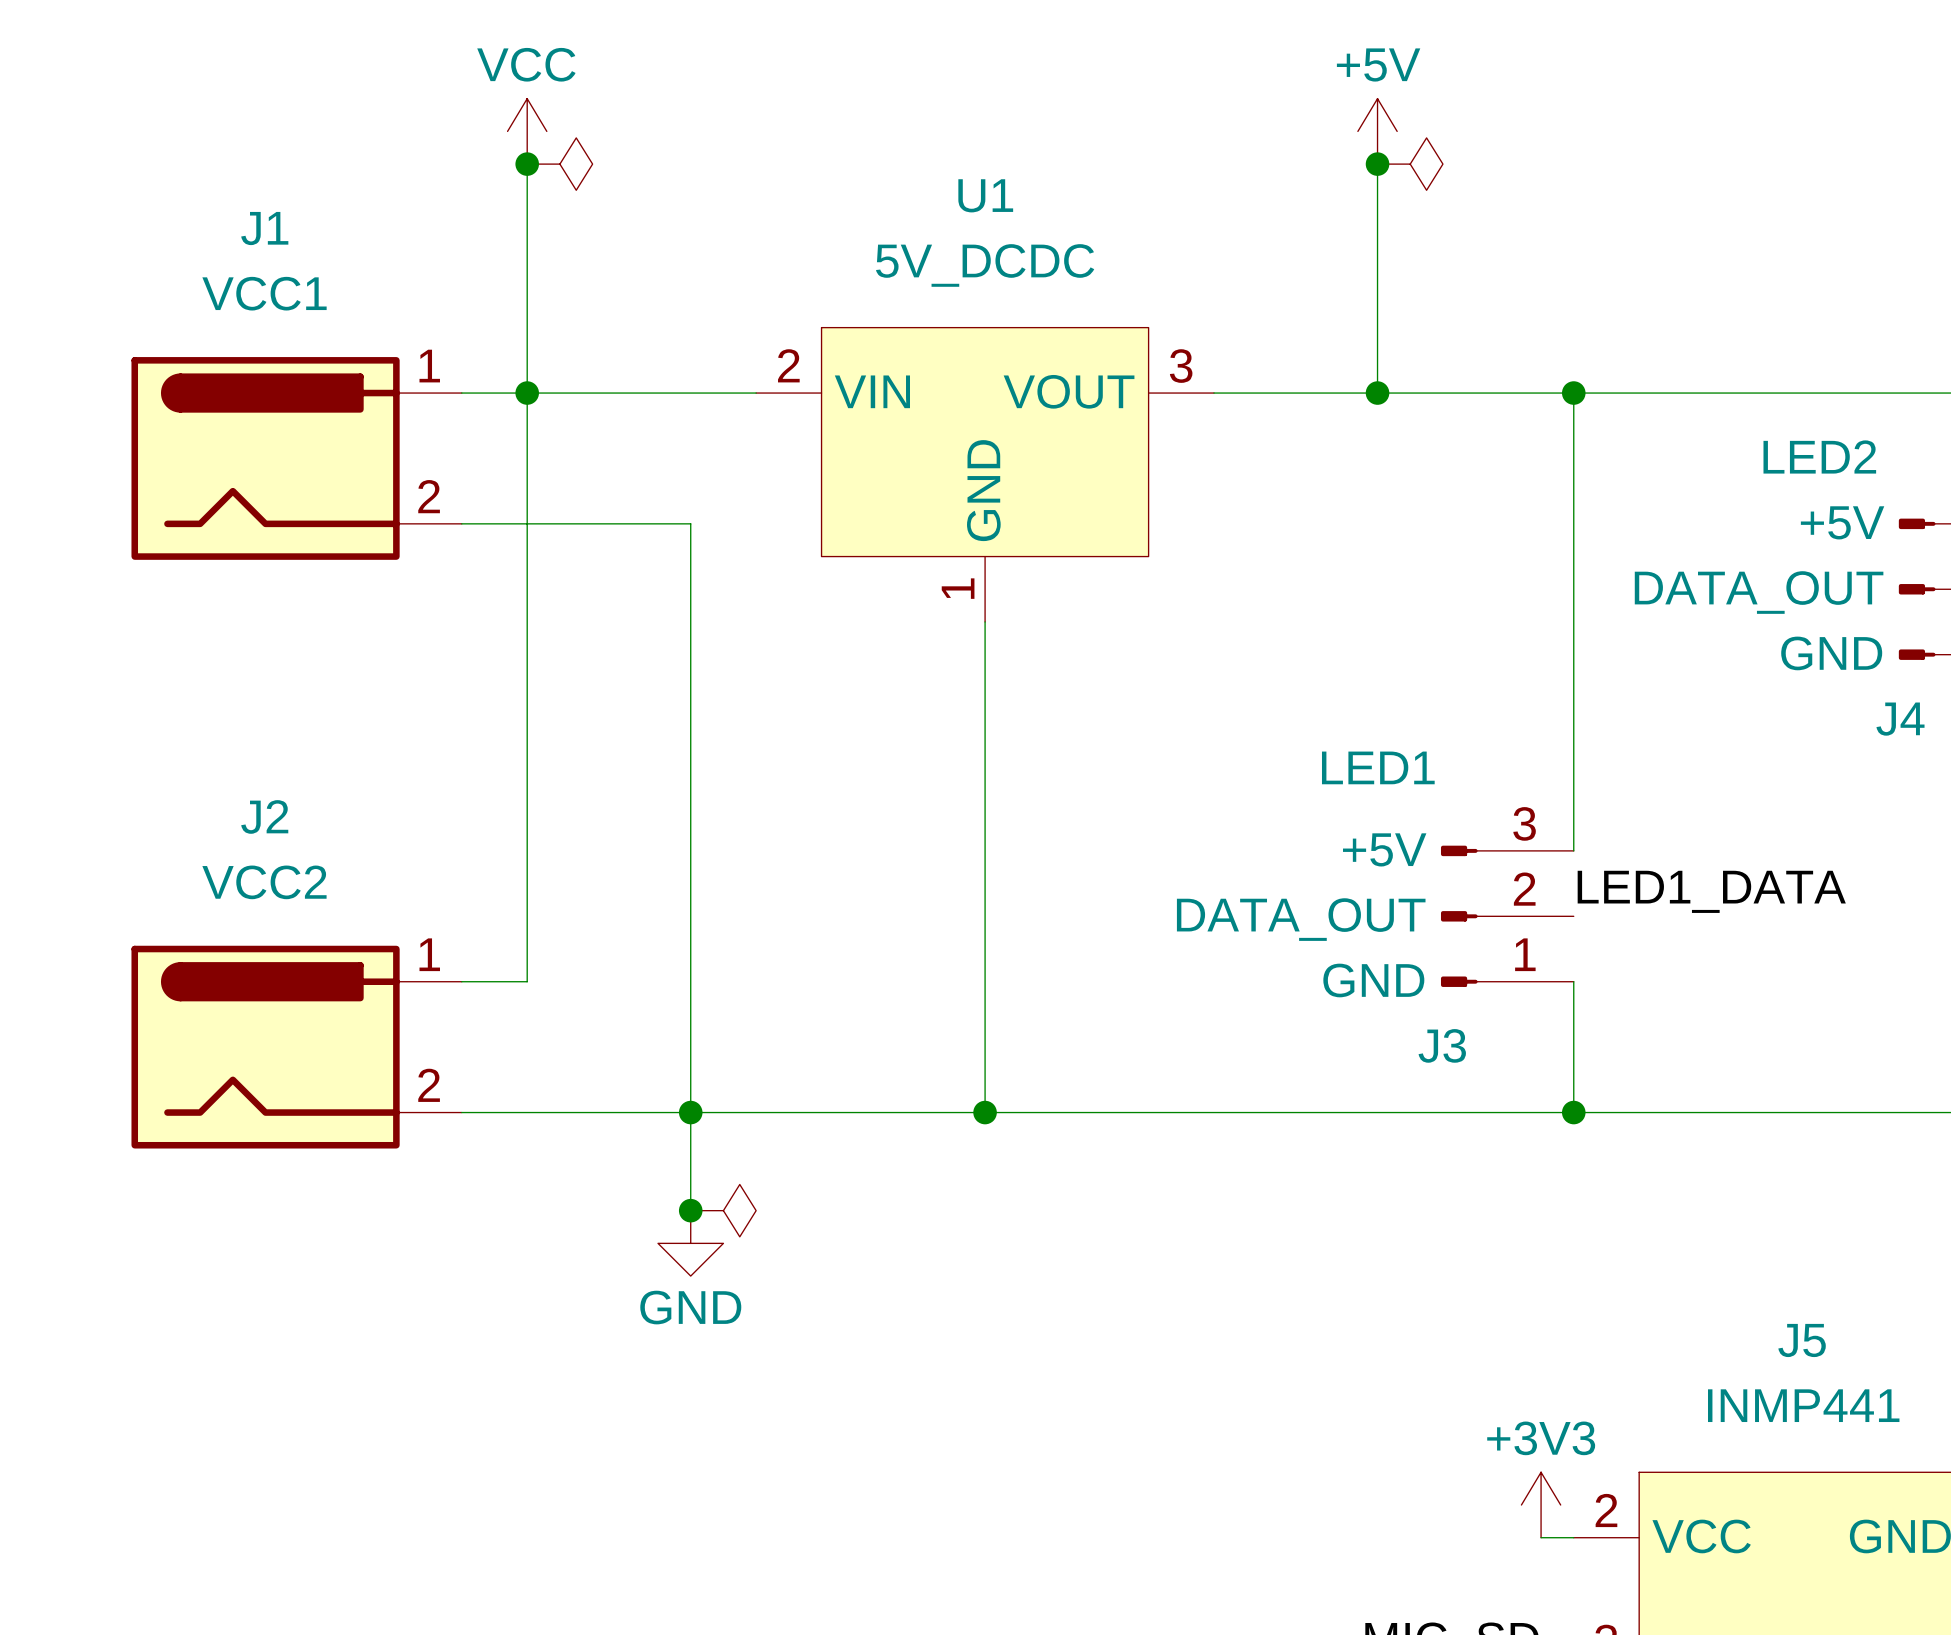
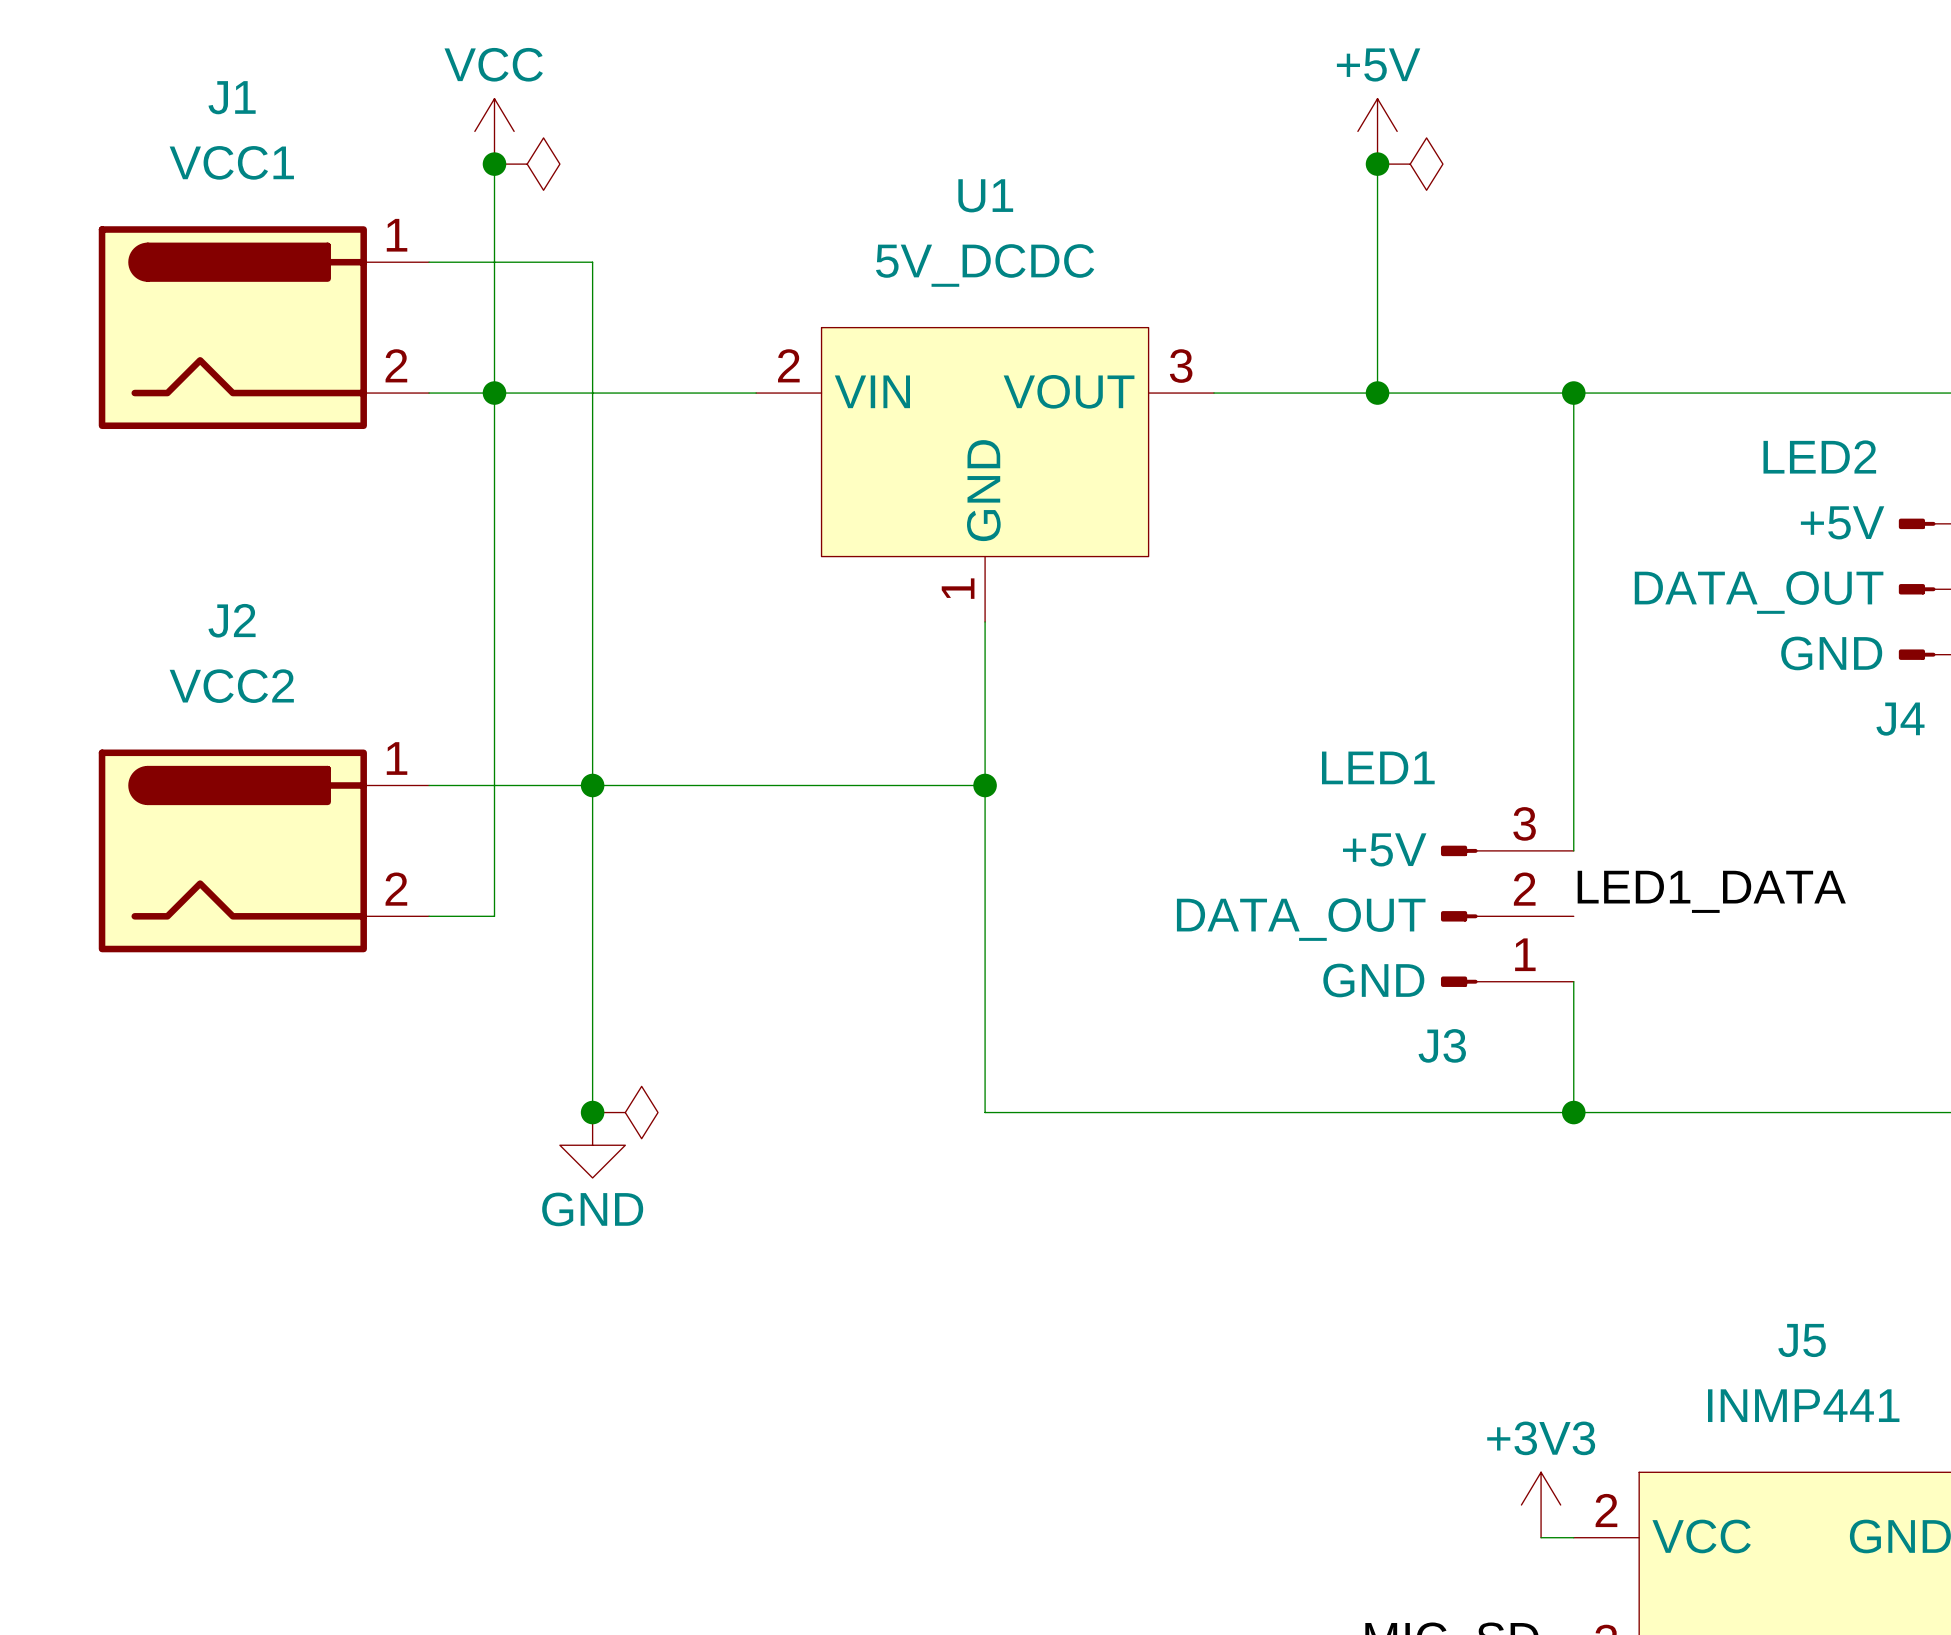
power symbol position: VCC (527, 131) -> VCC (494, 131)
wire: none -> (494, 164) (494, 916) (429, 916)
wire: (527, 164) (527, 981) (461, 981) -> none
junction position: (527, 164) -> (494, 164)
power symbol position: (559, 164) -> (527, 164)
wire: none -> (429, 262) (592, 262) (592, 1112)
junction position: (527, 393) -> (494, 393)
J1 position: (296, 458) -> (263, 327)
wire: (461, 523) (690, 523) (690, 1210) -> none
wire: none -> (429, 785) (985, 785)
junction: none -> (592, 785)
junction: none -> (985, 785)
J2 position: (296, 1047) -> (263, 850)
wire: (461, 1112) (985, 1112) -> none
junction: none -> (592, 1112)
junction: (690, 1112) -> none
junction: (985, 1112) -> none
junction: (690, 1210) -> none
power symbol position: (723, 1210) -> (625, 1112)
power symbol position: GND (690, 1243) -> GND (592, 1145)

